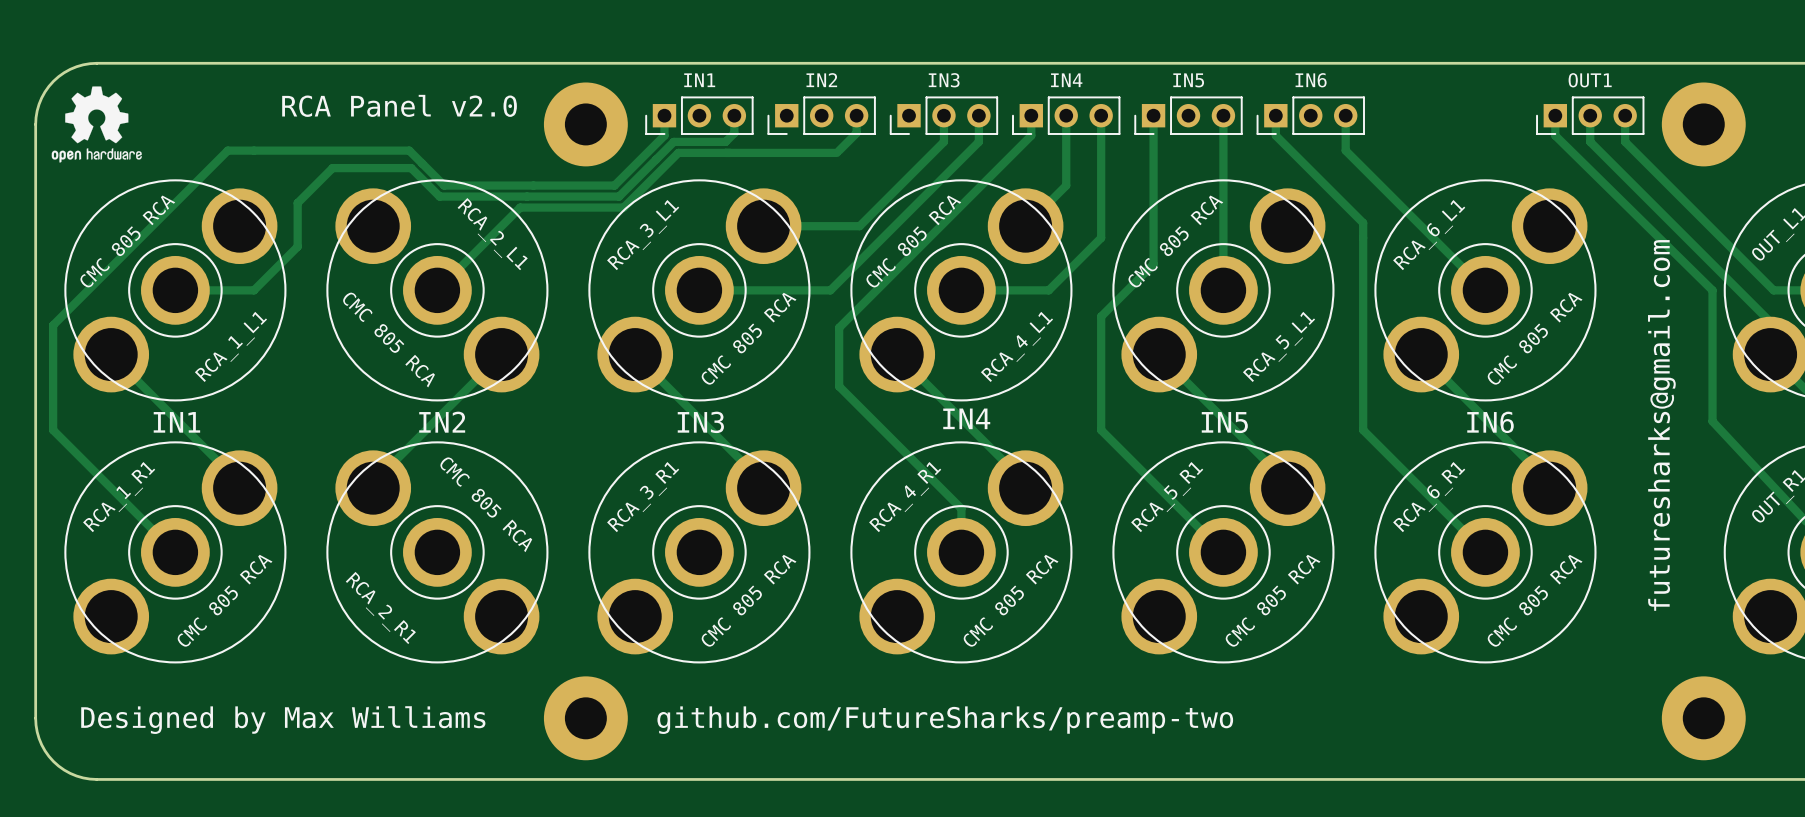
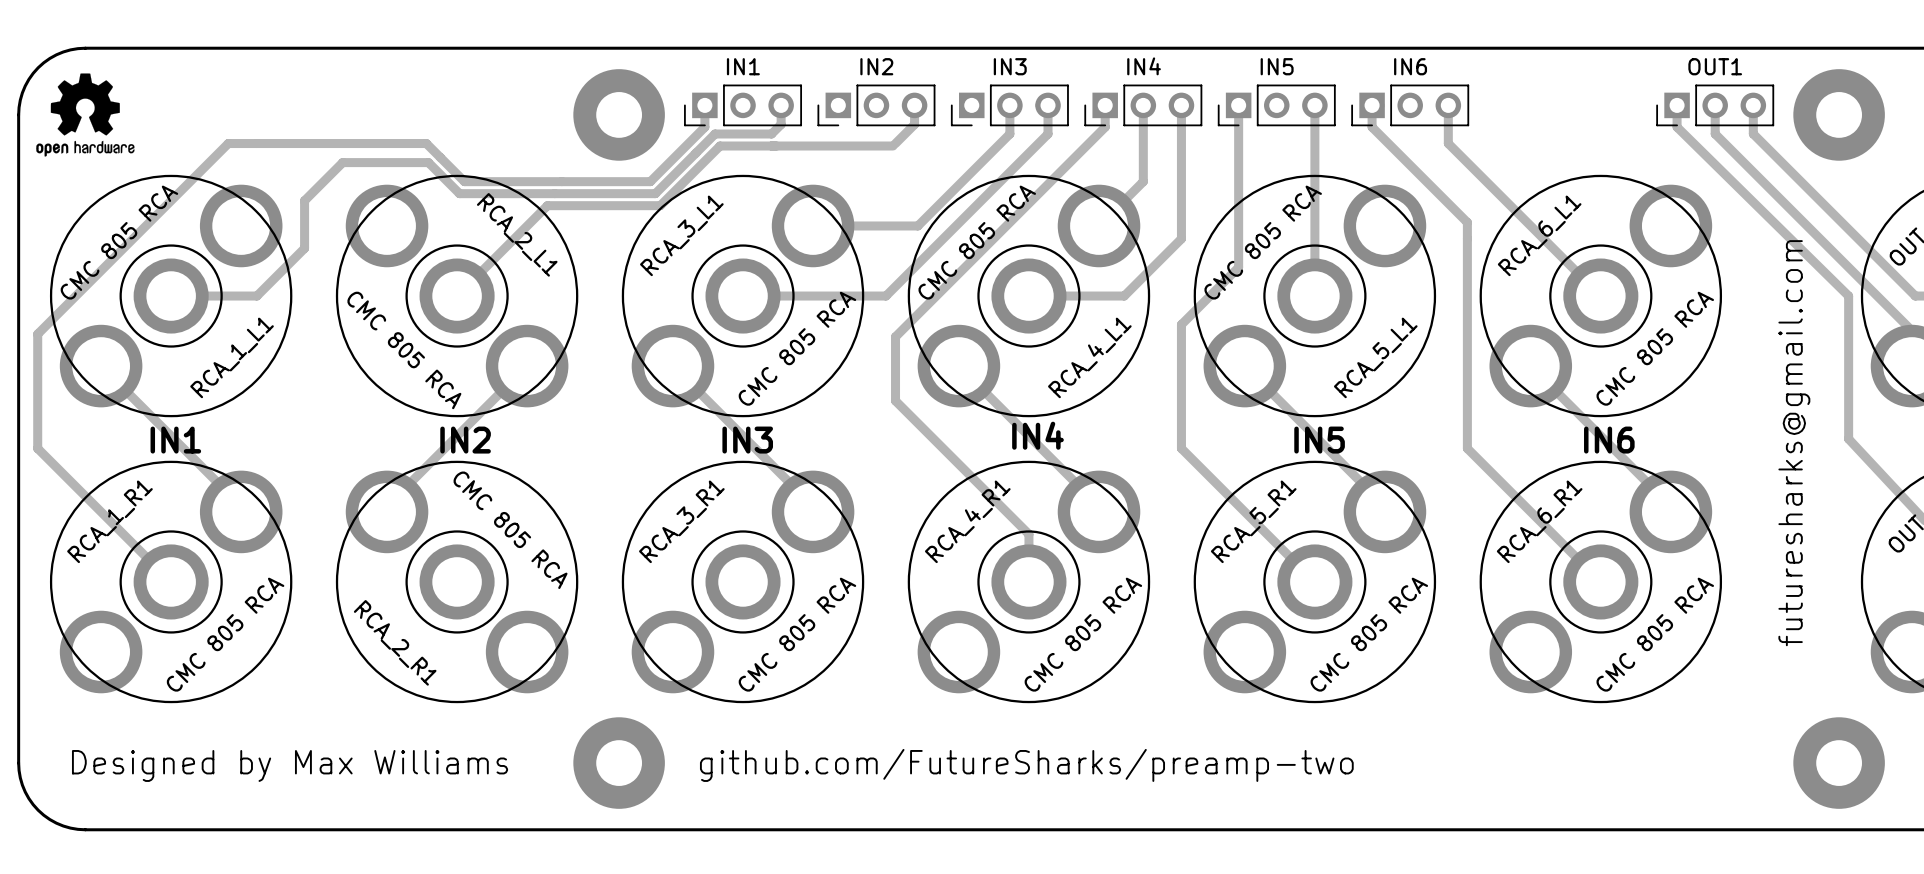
text: RCA Panel v2.0 (399, 105) -> none

